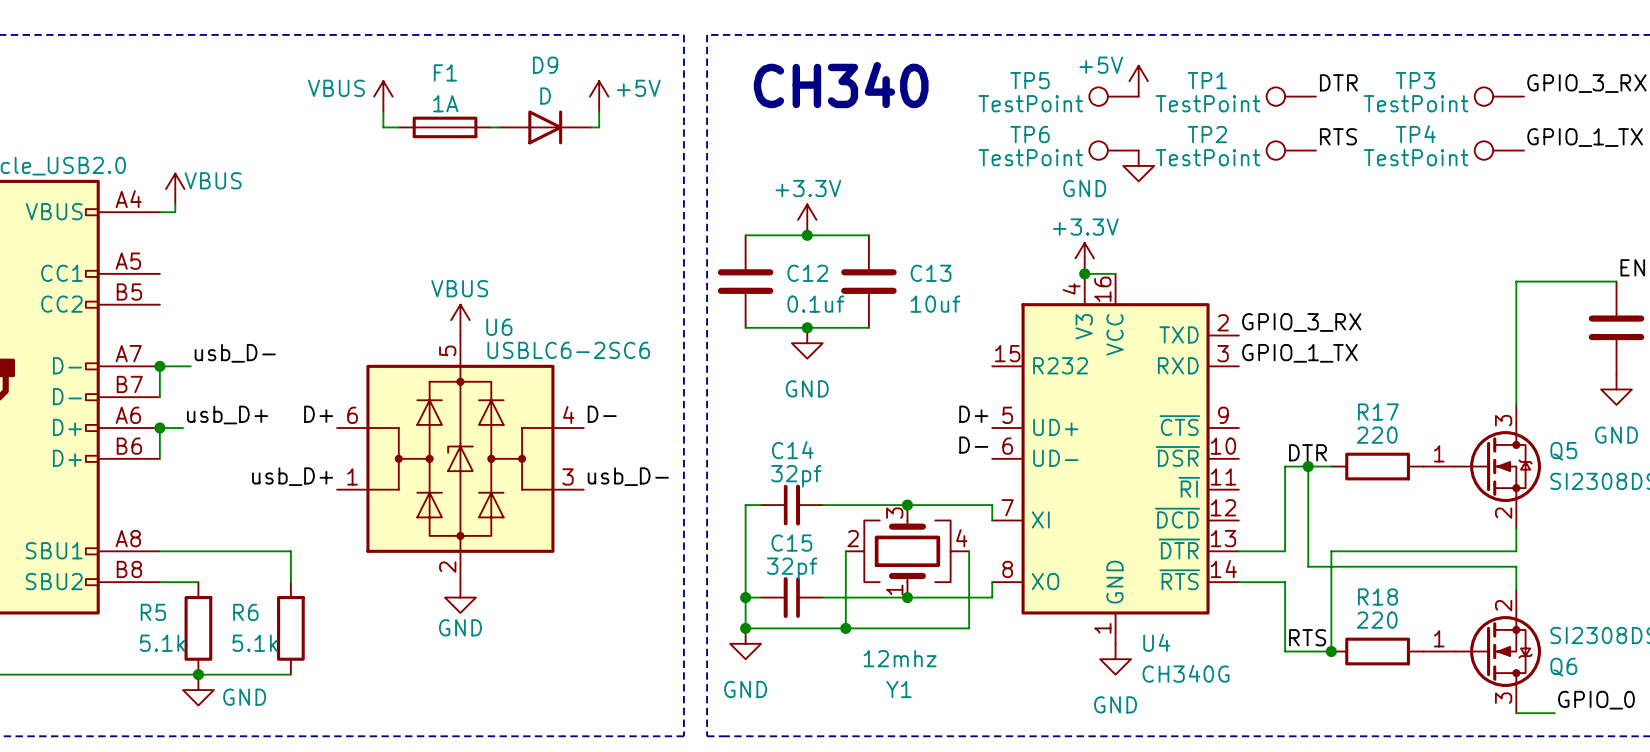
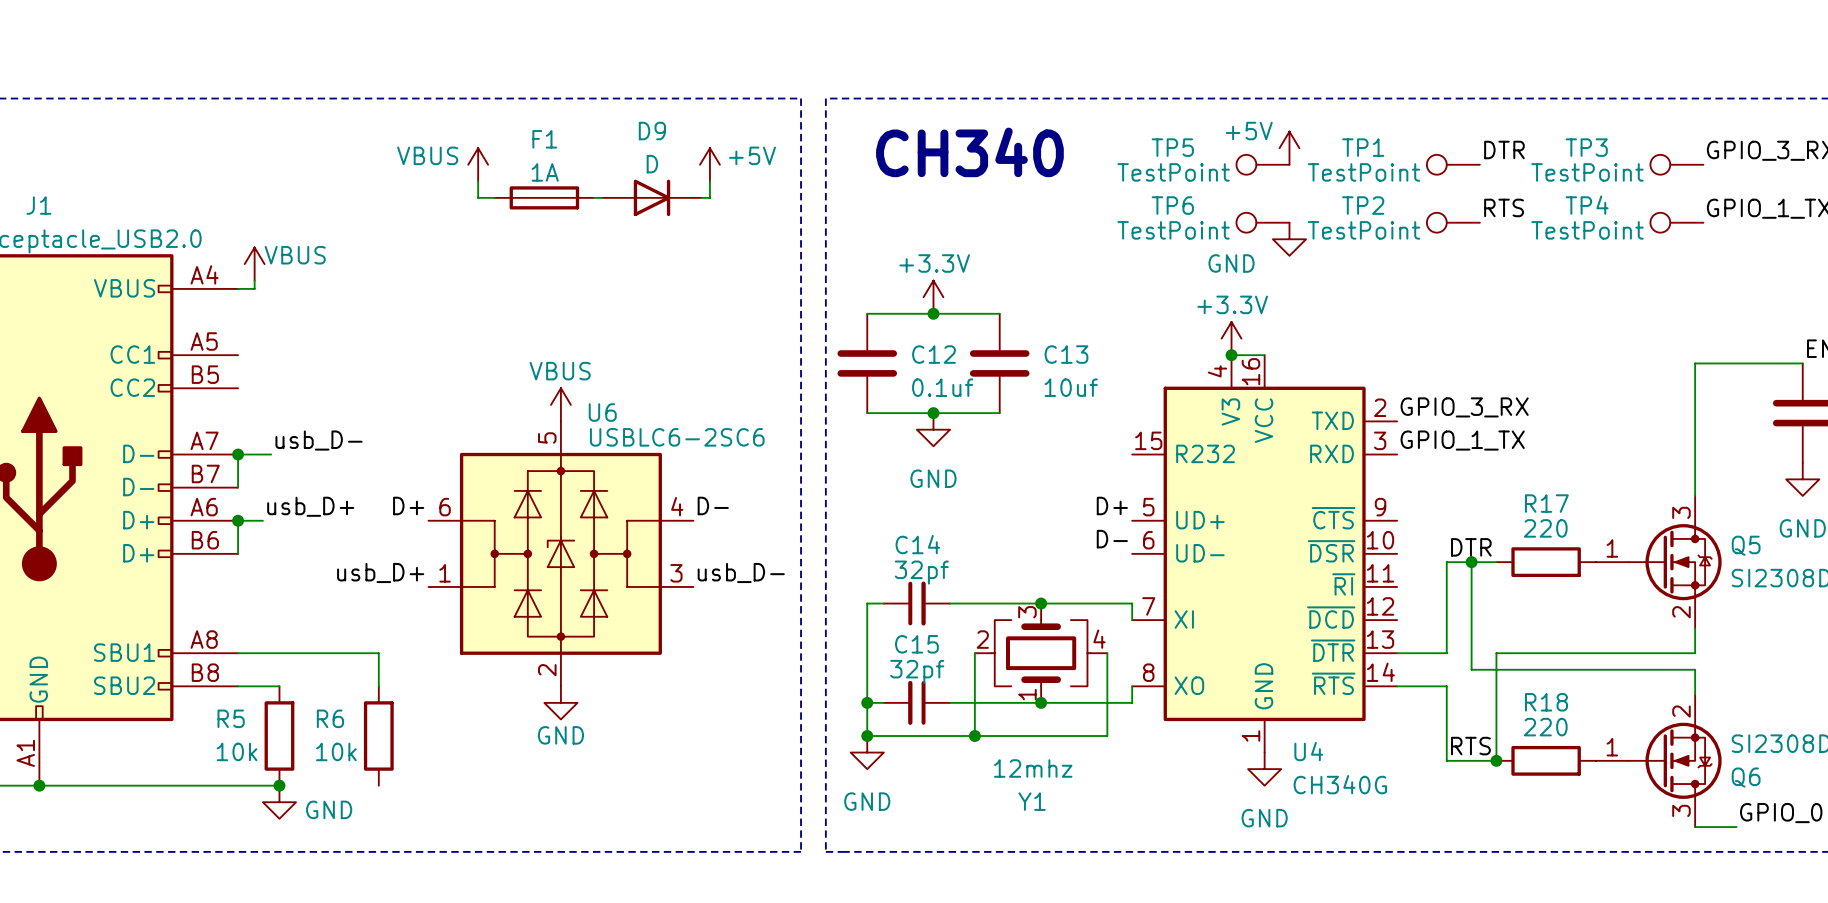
R5 value: 5.1k (162, 643) -> 10k (237, 751)
R6 value: 5.1k (255, 643) -> 10k (336, 751)
wire: (198, 674) (290, 674) -> none

